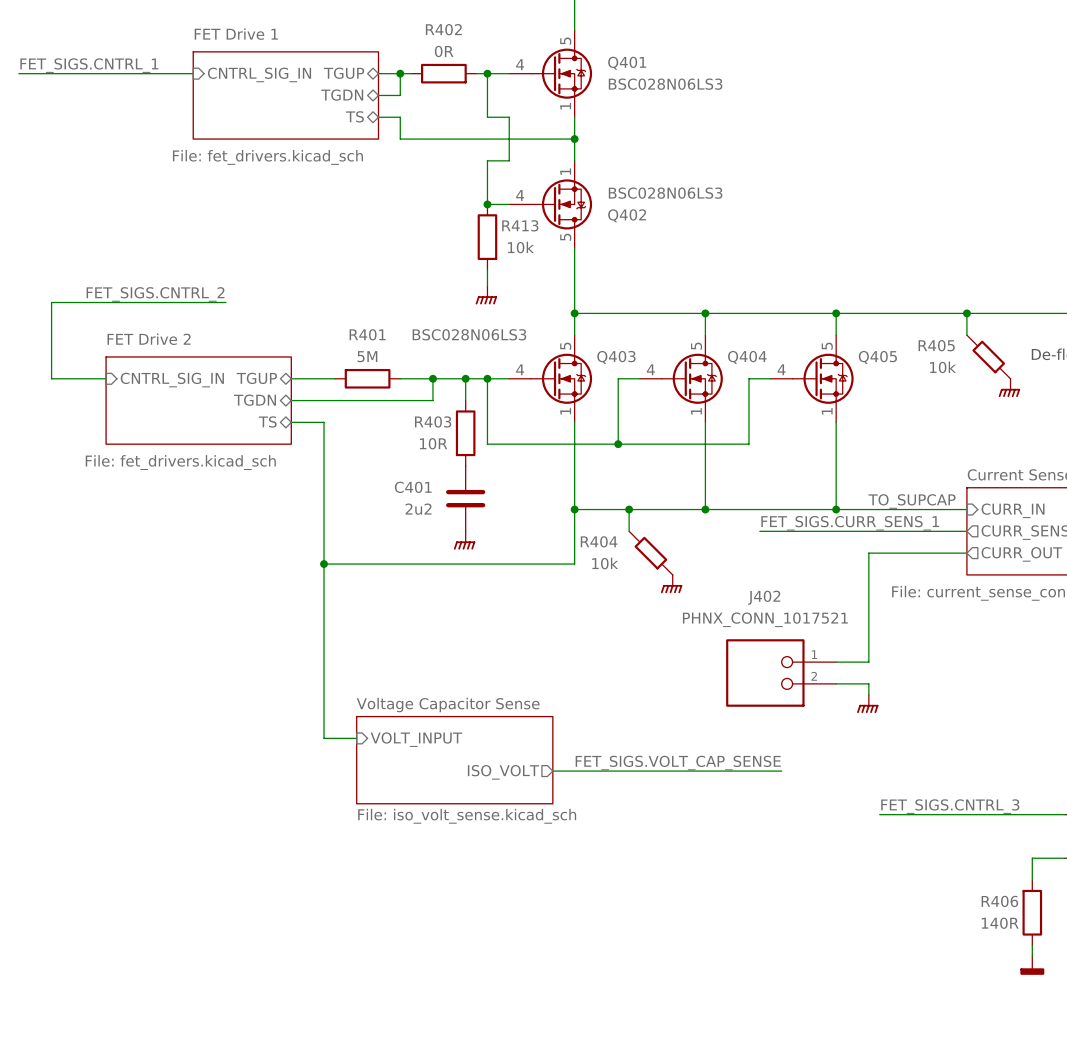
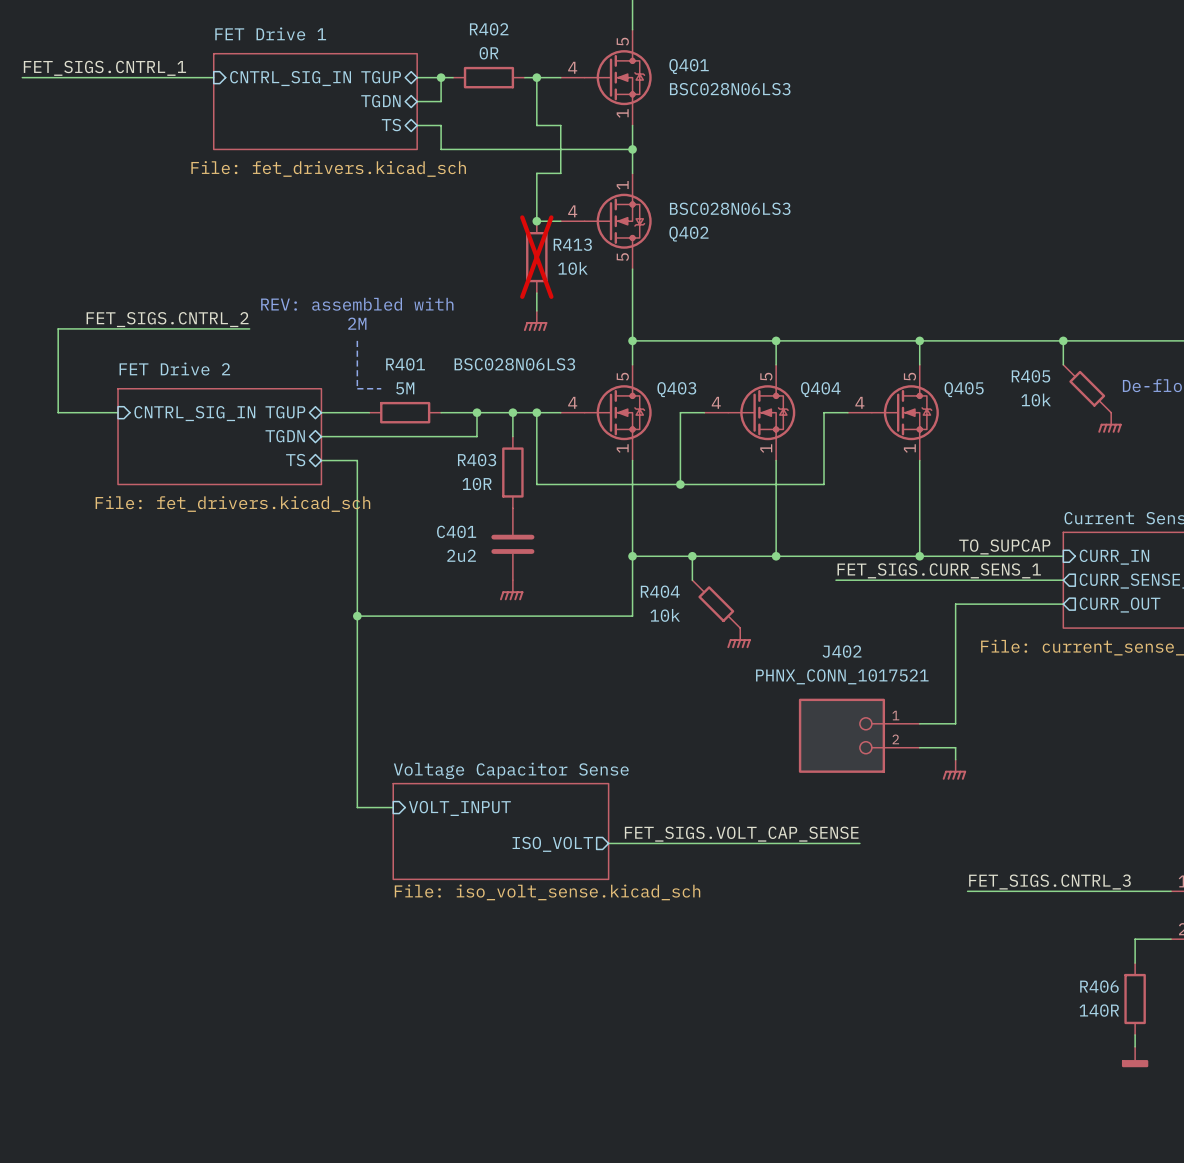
R413 do-not-place cross: none -> (536, 257)
text: none -> REV: assembled with (357, 304)
text: none -> 2M (357, 323)
line: none -> (357, 340) (357, 388) (381, 388)

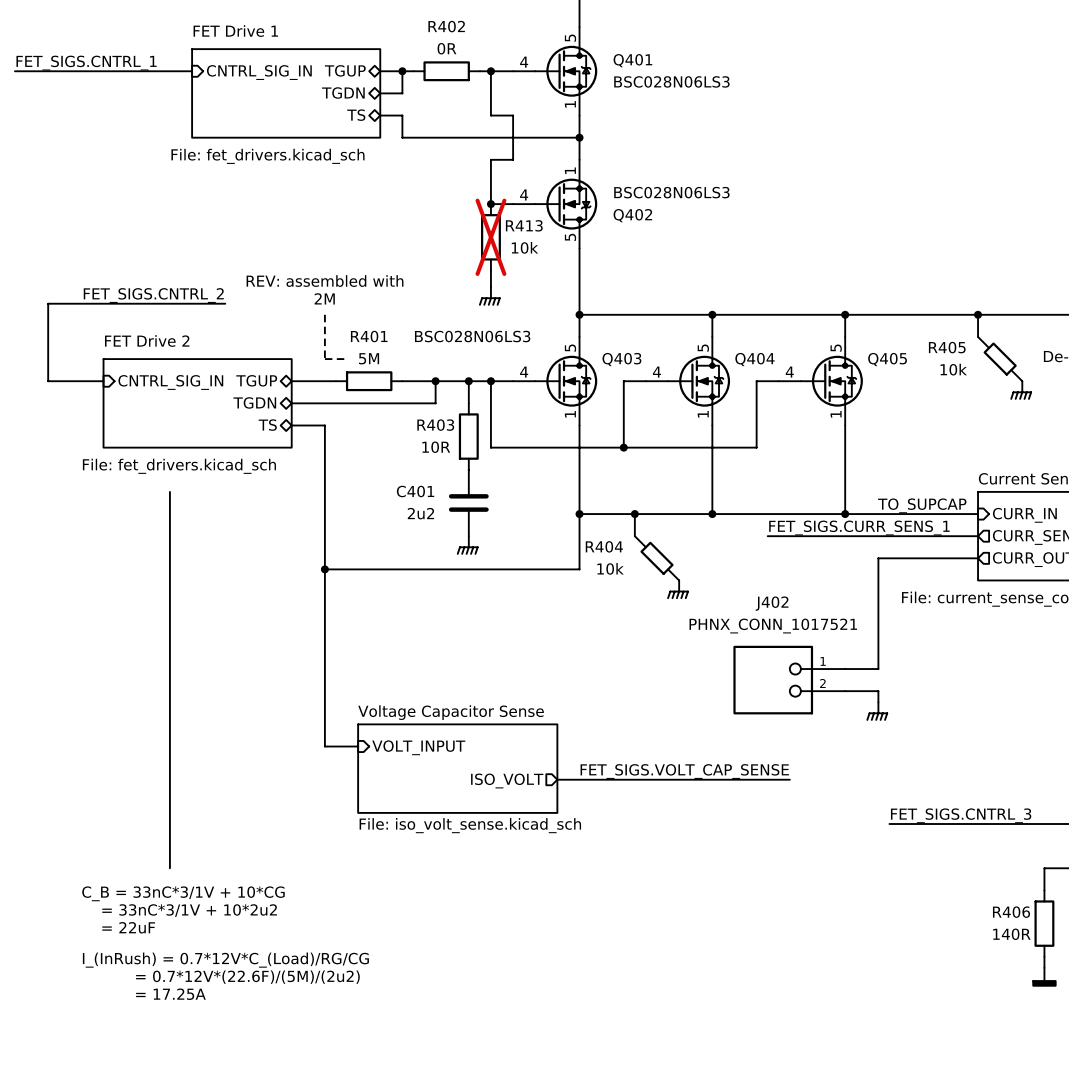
line: none -> (169, 491) (169, 868)
text: none -> C_B = 33nC*3/1V + 10*CG (183, 893)
text: none -> = 33nC*3/1V + 10*2u2 (189, 910)
text: none -> = 22uF (128, 927)
text: none -> I_(InRush) = 0.7*12V*C_(Load)/RG/CG (225, 960)
text: none -> = 0.7*12V*(22.6F)/(5M)/(2u2) (247, 977)
text: none -> = 17.25A (170, 994)

